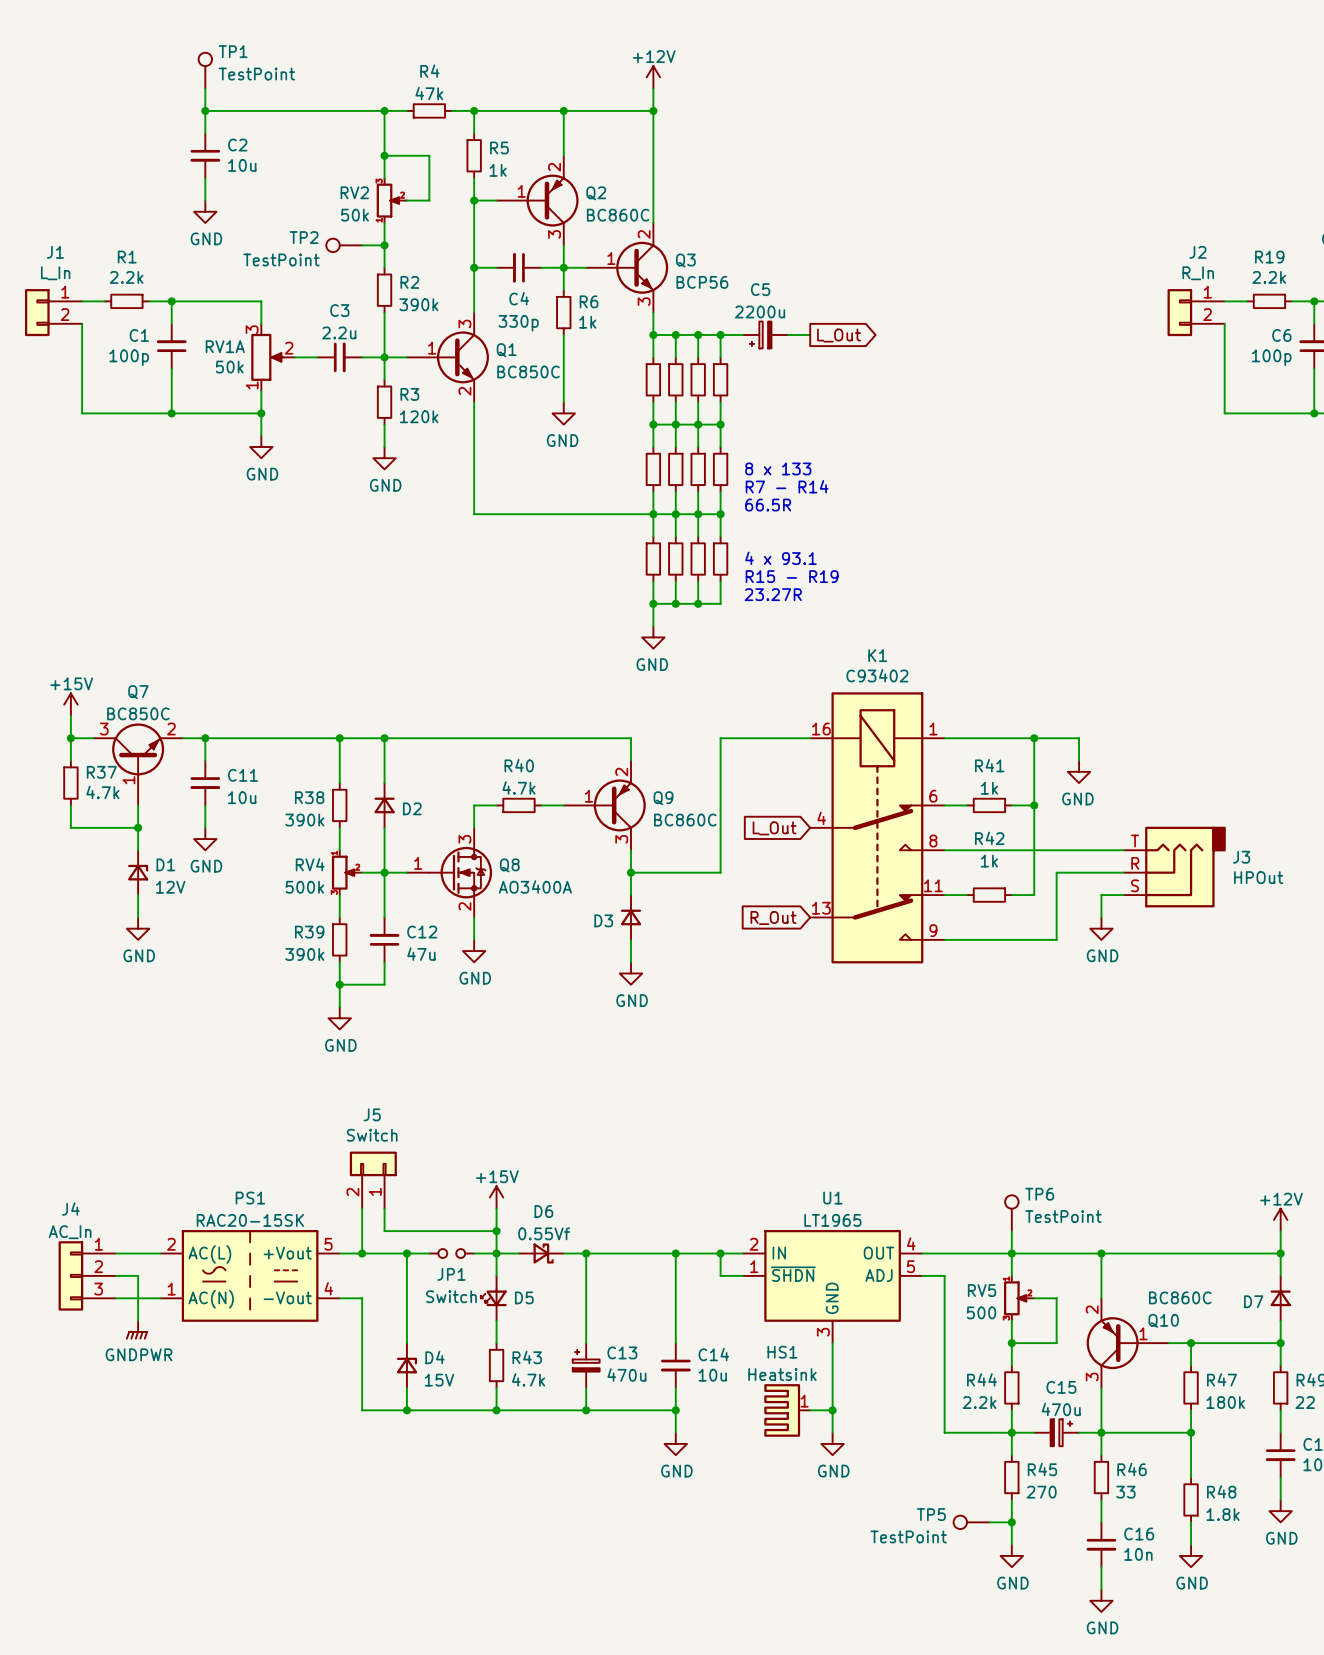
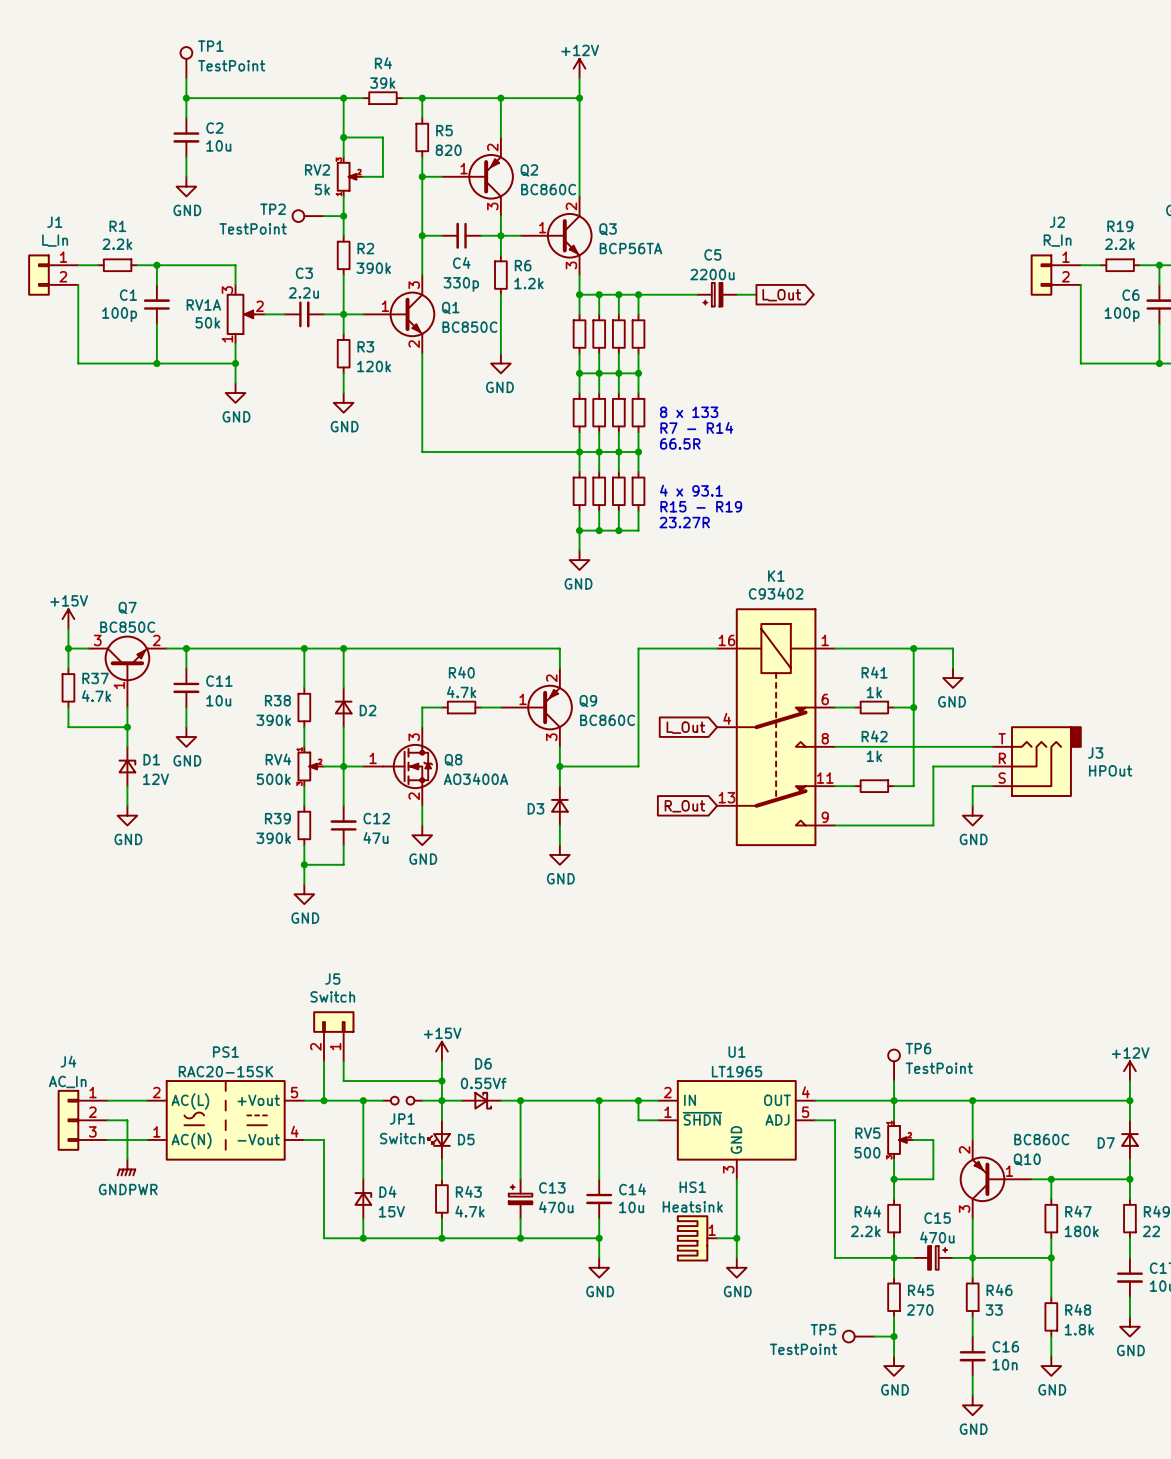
R4 value: 47k (429, 93) -> 39k (382, 83)
R5 value: 1k (498, 170) -> 820 (448, 150)
RV2 value: 50k (355, 215) -> 5k (322, 189)
Q3 value: BCP56 (702, 282) -> BCP56TA (630, 248)
R6 value: 1k (587, 322) -> 1.2k (528, 283)
C5 position: (765, 334) -> (717, 294)
wire: none -> (736, 294) (756, 294)
global label position: L_Out (839, 335) -> L_Out (781, 295)

